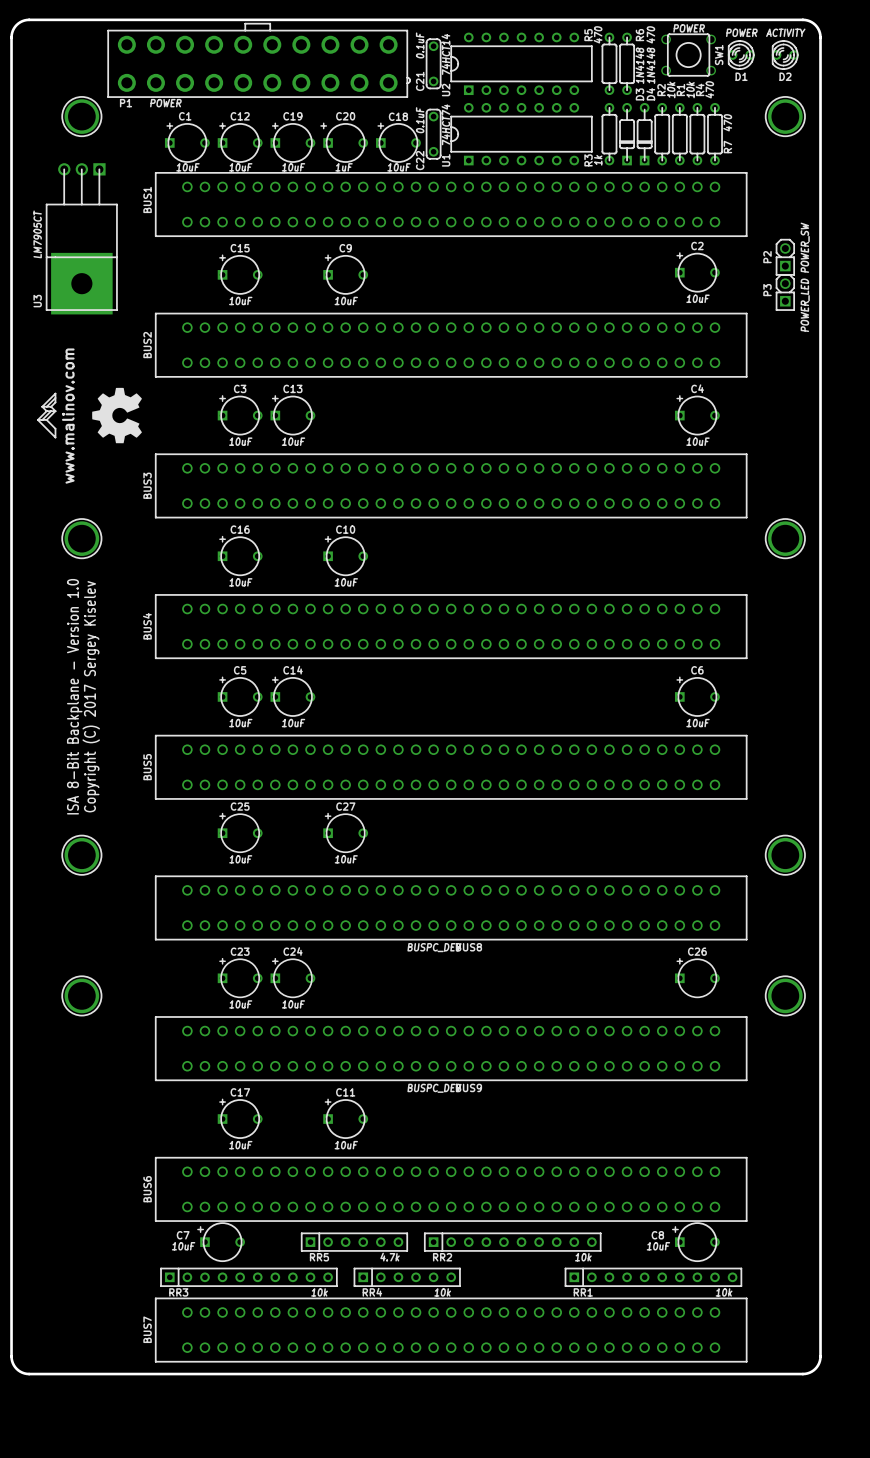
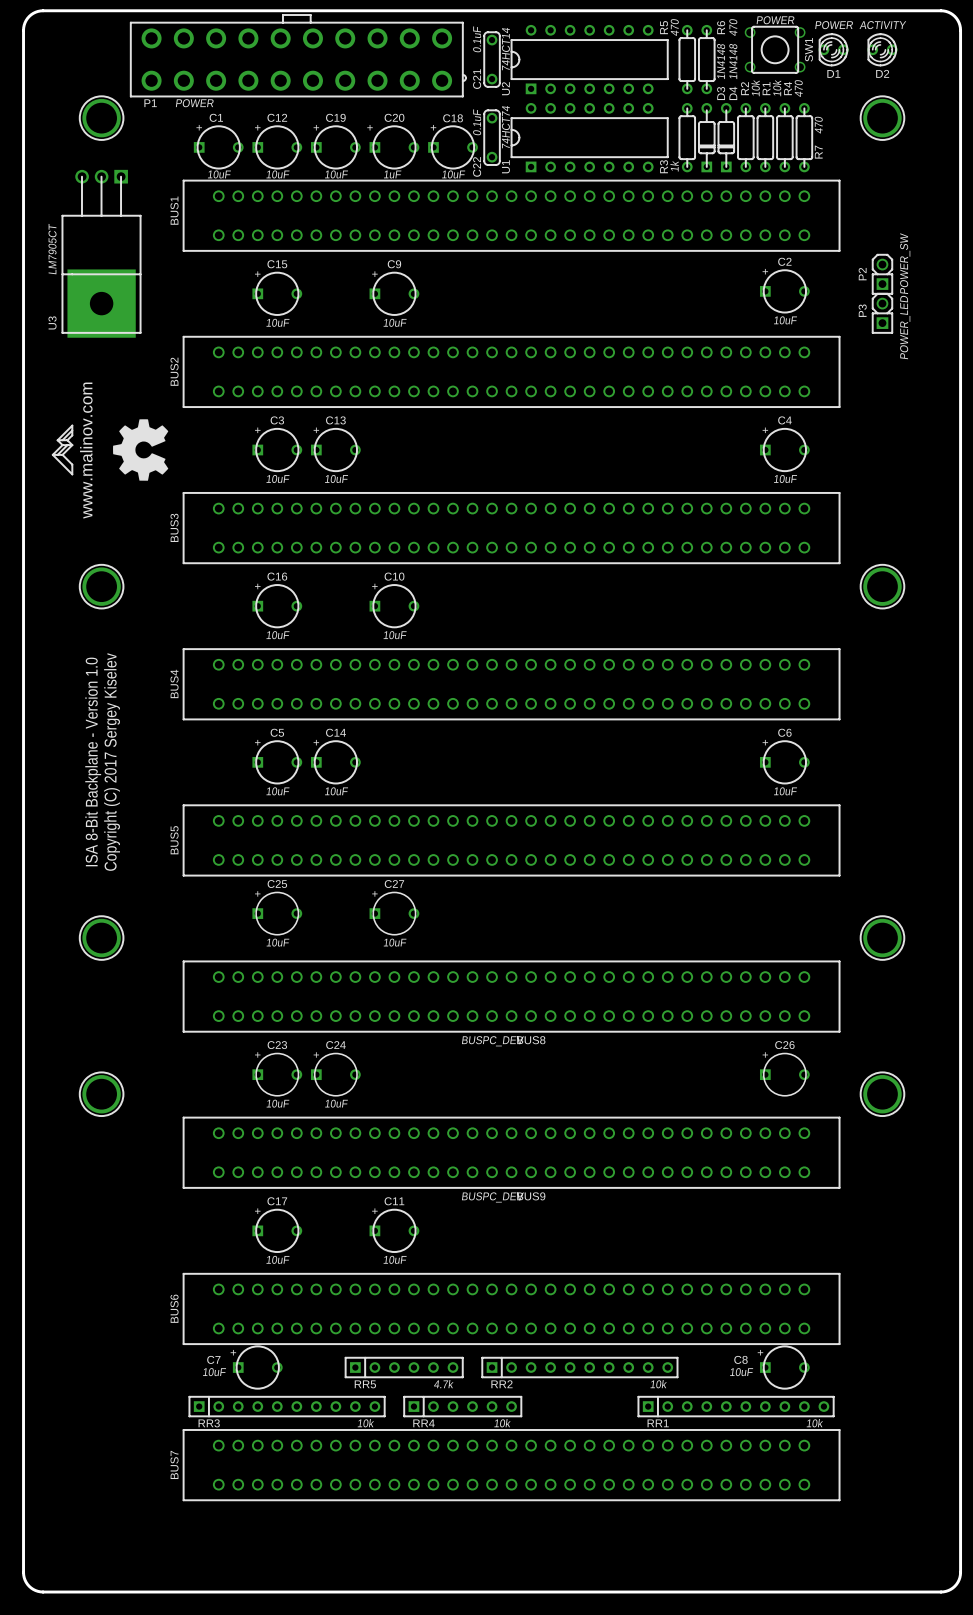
board edge: (802, 19) (815, 25) (820, 37) (820, 1356) (818, 1365) (811, 1371) (802, 1374) (29, 1374) (16, 1368) (11, 1356) -> (902, 10) (946, 11) (956, 18) (960, 30) (960, 1572) (957, 1582) (950, 1589) (941, 1592) (40, 1591) (29, 1586) (23, 1575) (23, 1494)

